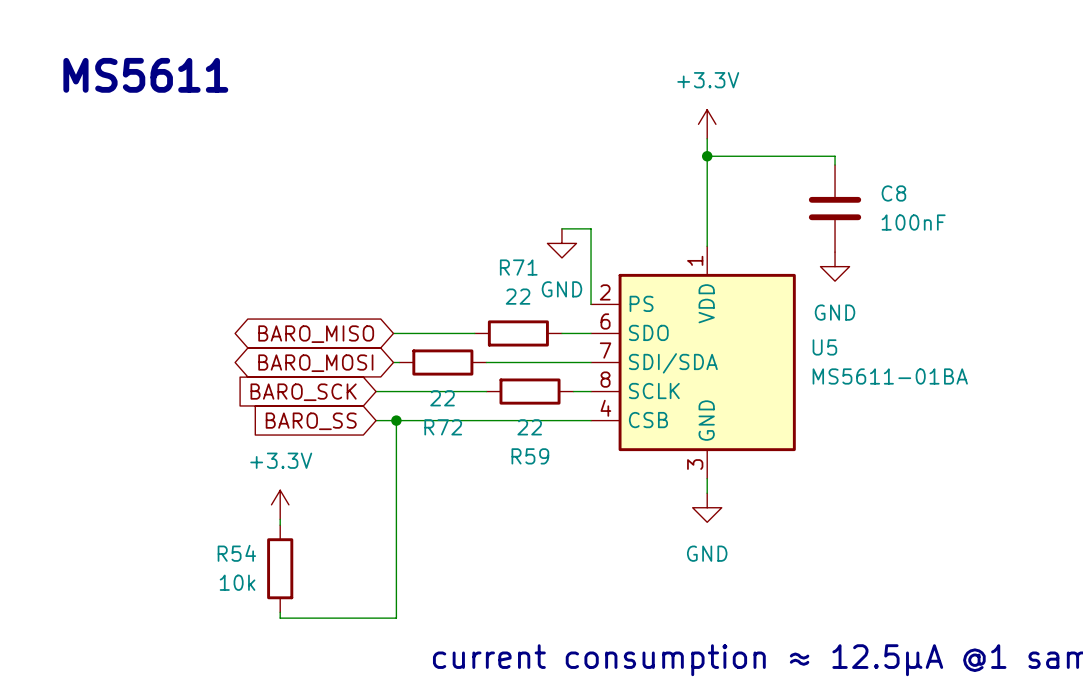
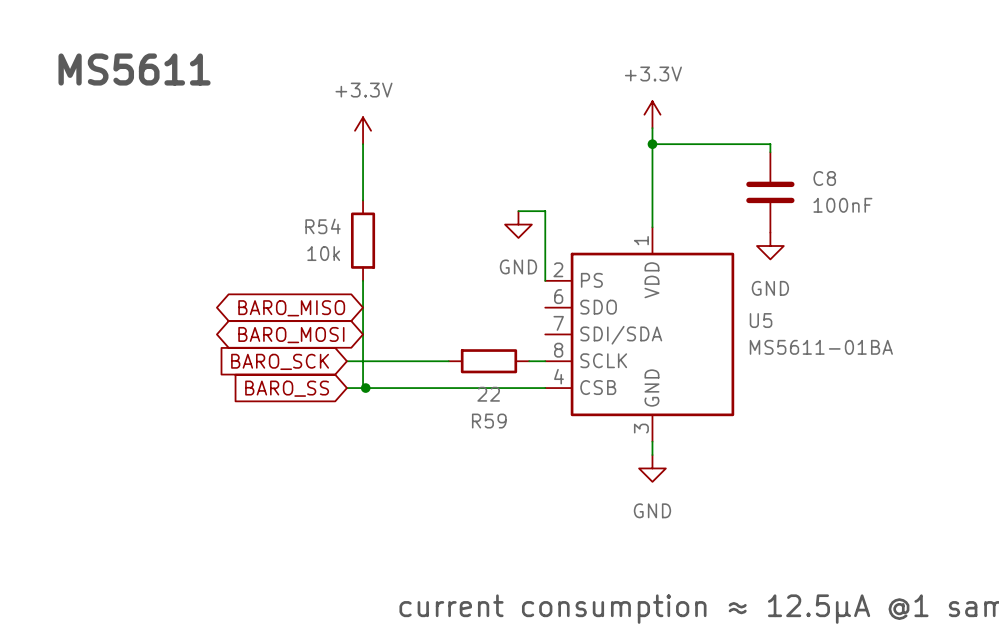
power symbol: none -> +3.3V (363, 130)
wire: none -> (363, 144) (363, 200)
wire: none -> (363, 280) (363, 388)
wire: (393, 333) (474, 333) -> none
R71: 22 (518, 333) -> none
wire: (561, 333) (591, 333) -> none
wire: (393, 362) (399, 362) -> none
R72: 22 (442, 362) -> none
wire: (486, 362) (591, 362) -> none
wire: (396, 420) (396, 618) (280, 618) (280, 612) -> none
power symbol: +3.3V (280, 504) -> none
wire: (280, 519) (280, 525) -> none
R54 position: (280, 568) -> (363, 240)

